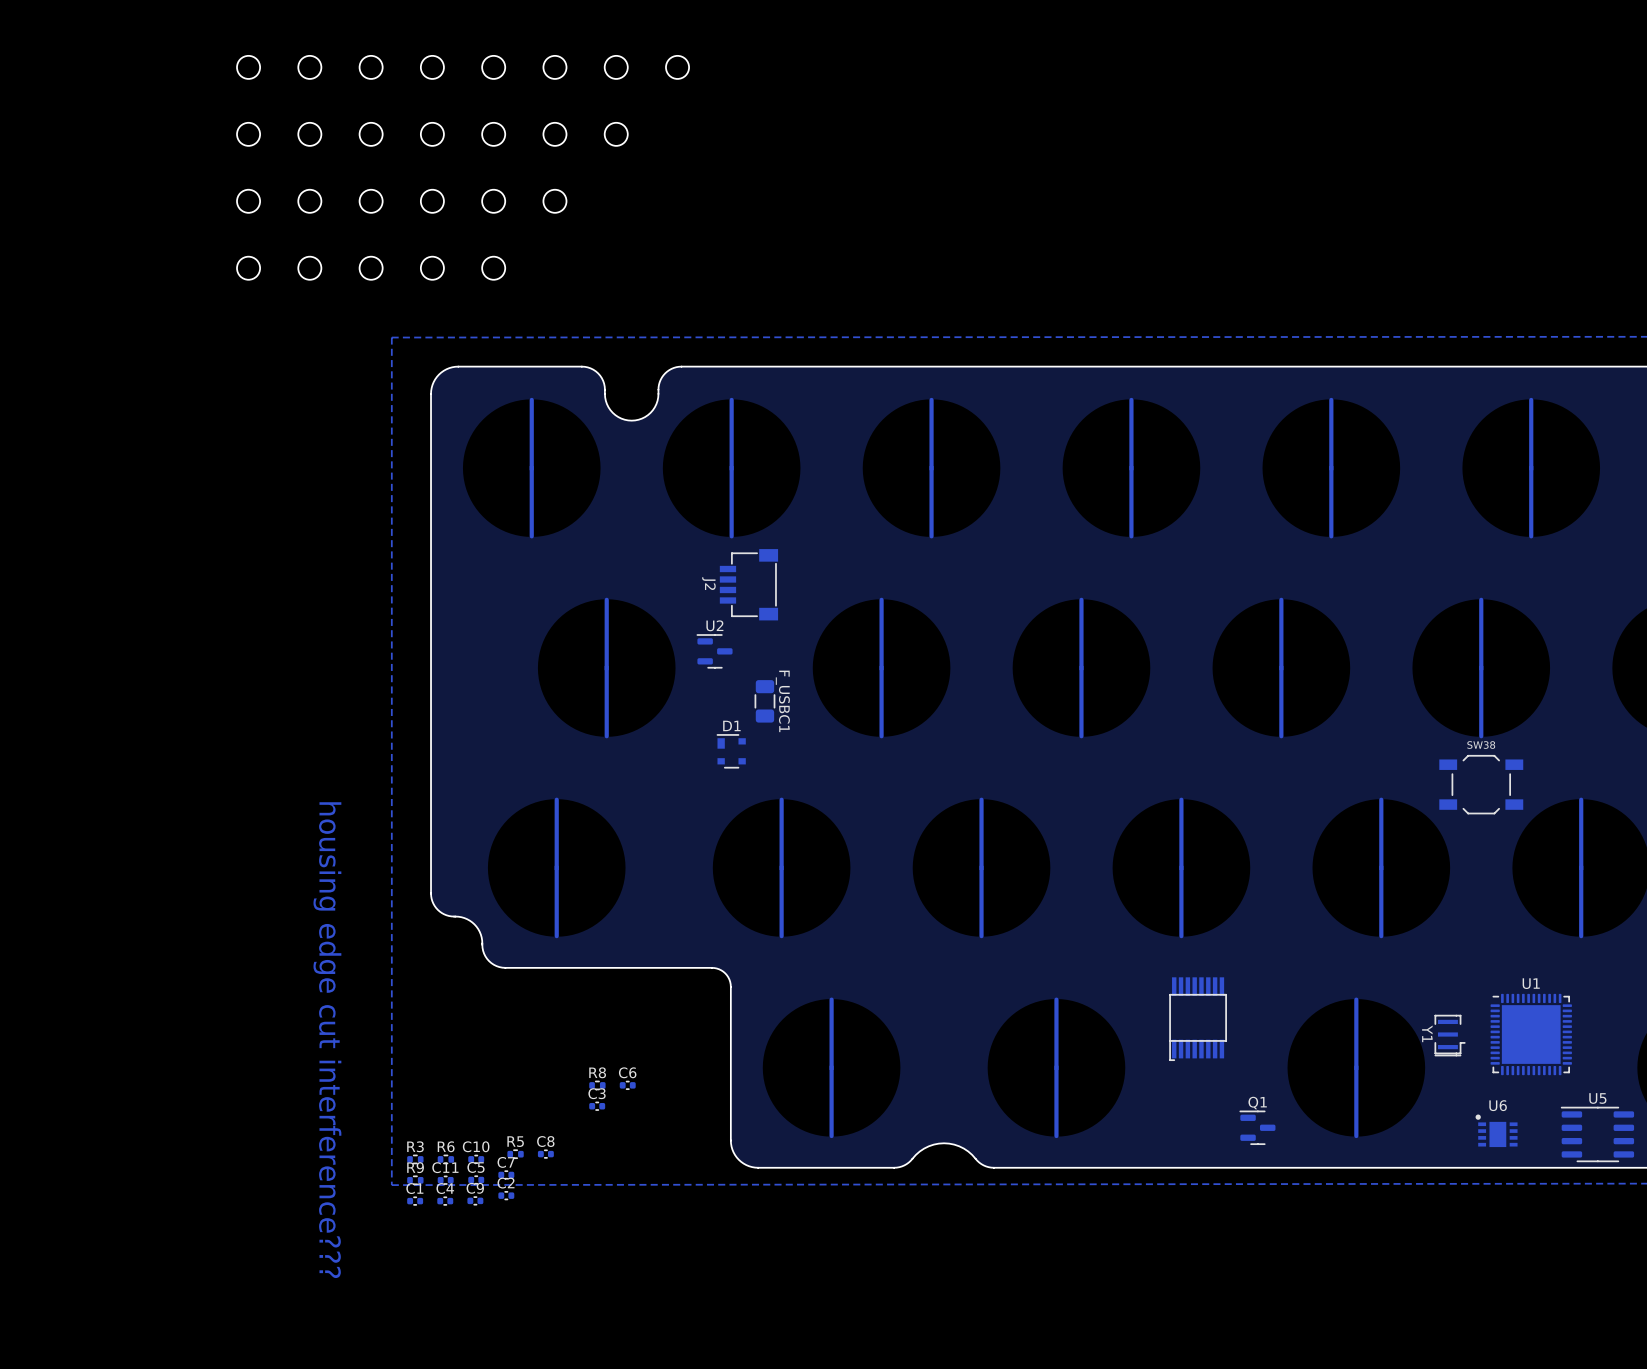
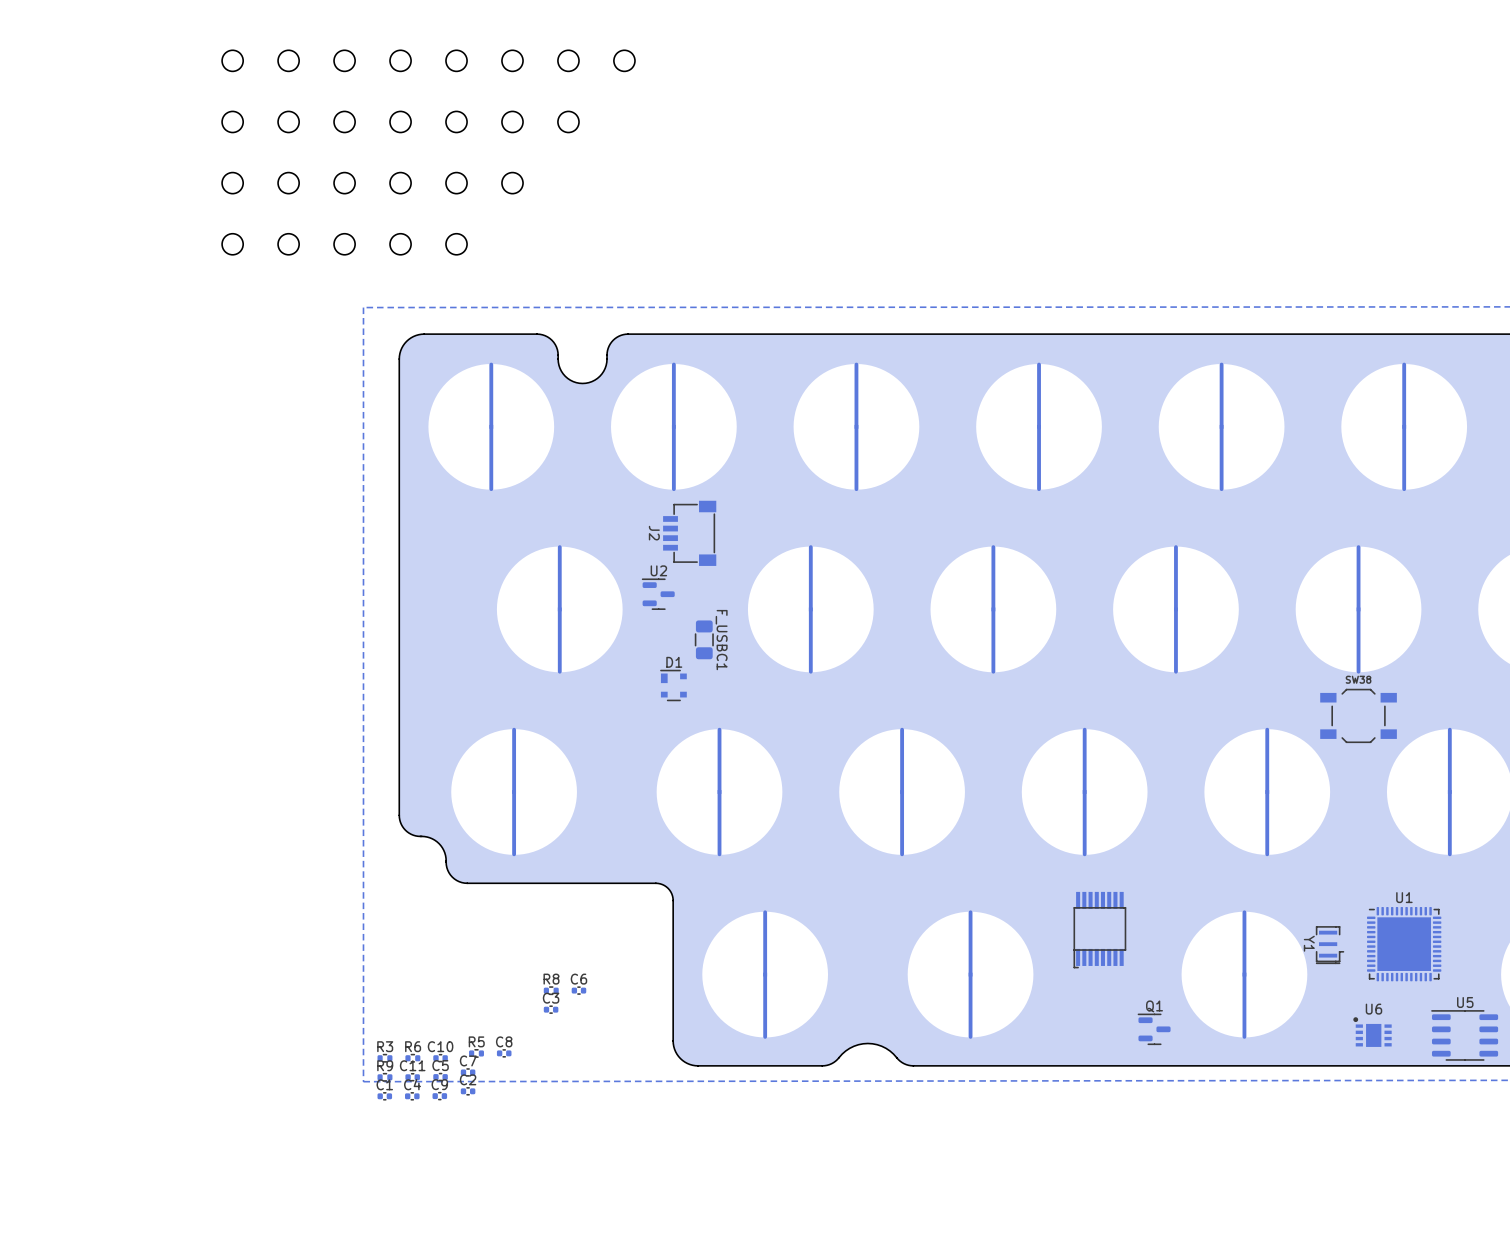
text: housing edge cut interference??? (327, 1040) -> none

